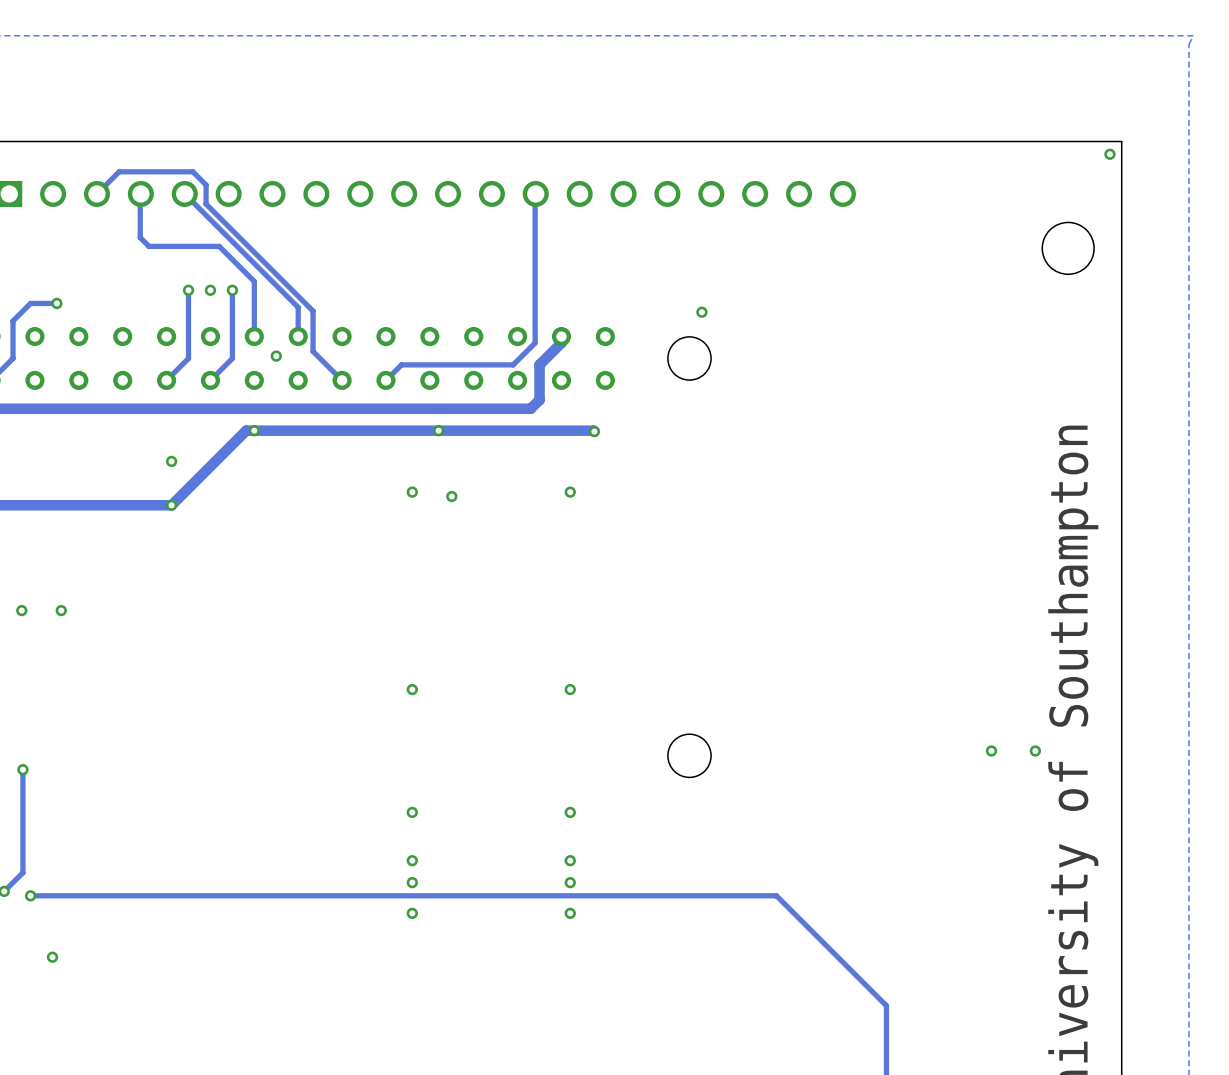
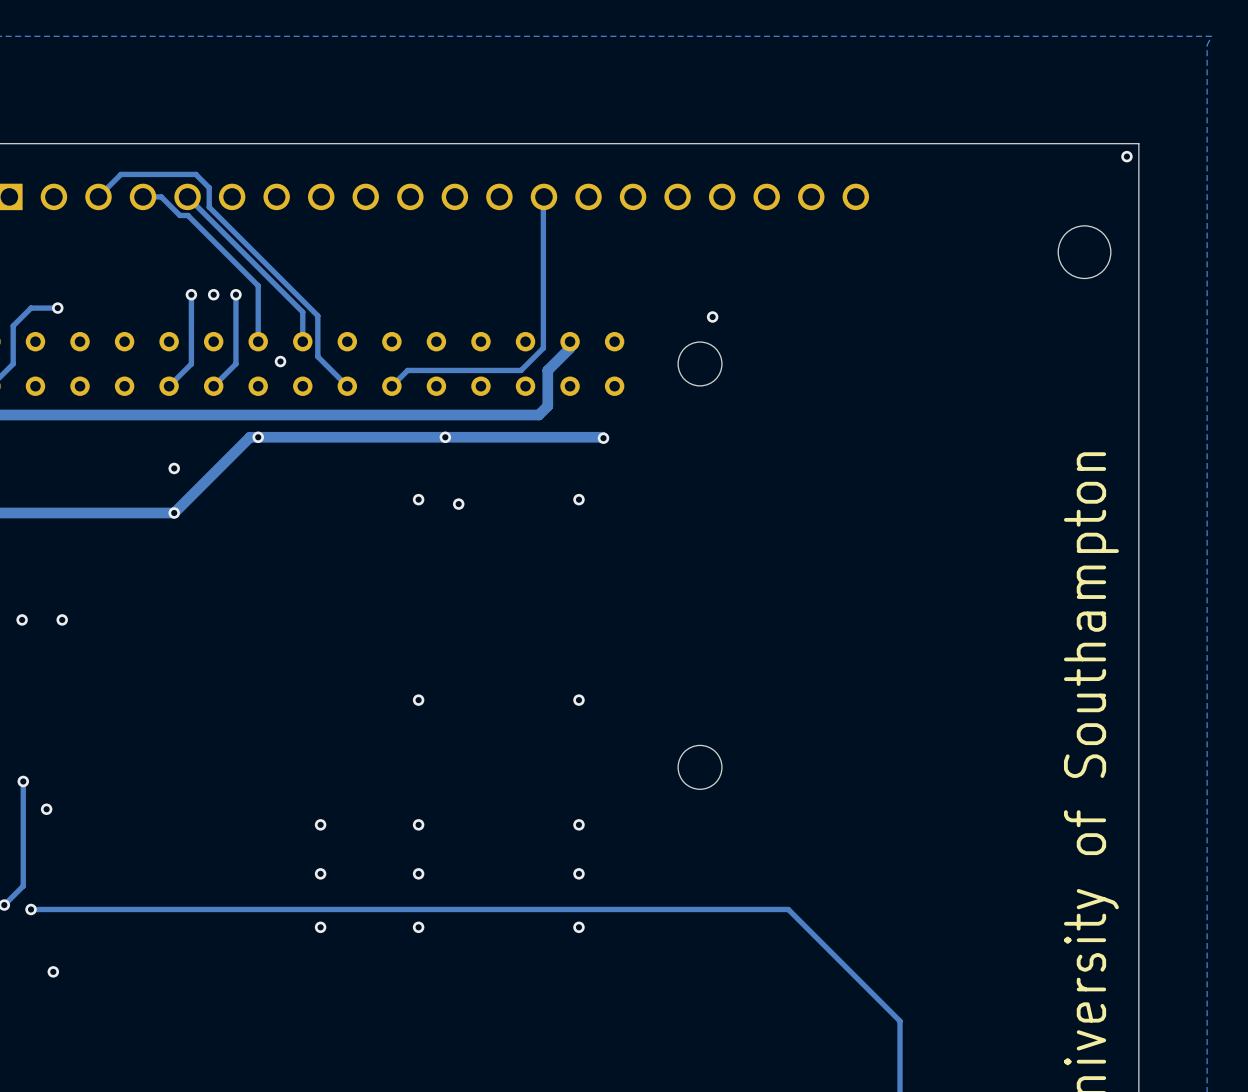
track: (140, 193) (140, 237) (149, 246) (219, 246) -> (143, 196) (161, 196) (179, 215) (187, 215) (222, 250)
via: (991, 751) -> none
via: (1035, 751) -> none
via: none -> (46, 809)
via: none -> (320, 824)
via: none -> (320, 873)
via: (412, 882) -> none
via: (570, 882) -> none
via: none -> (320, 927)

